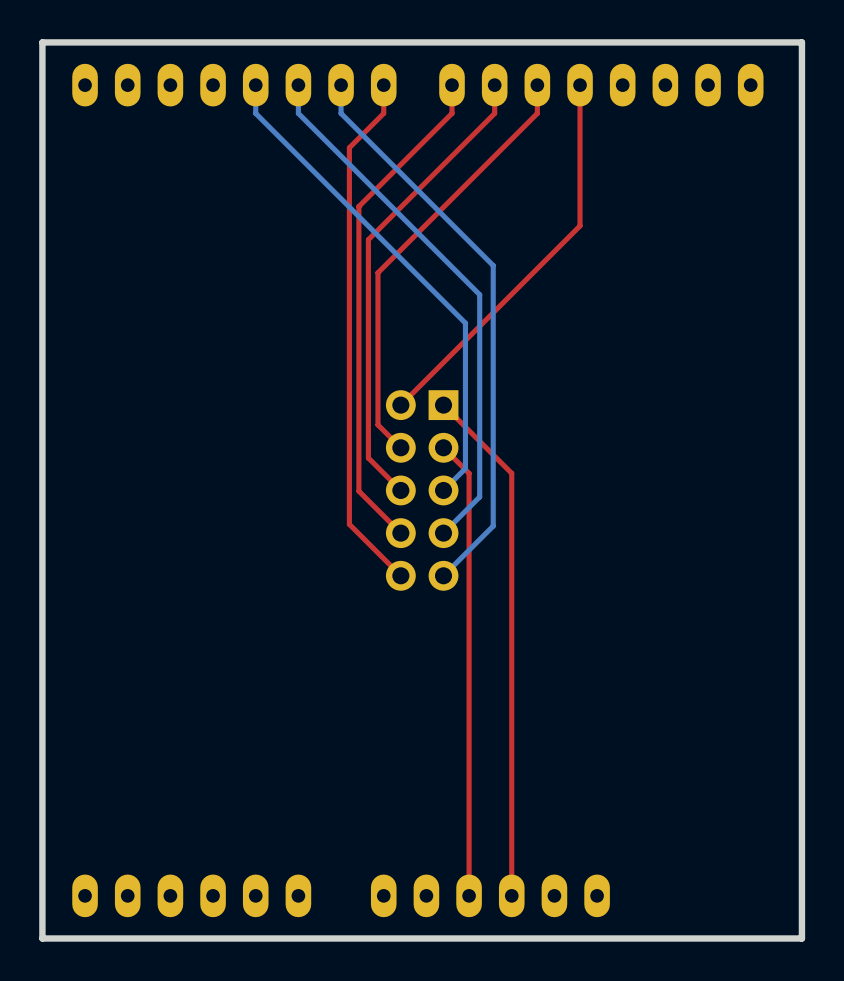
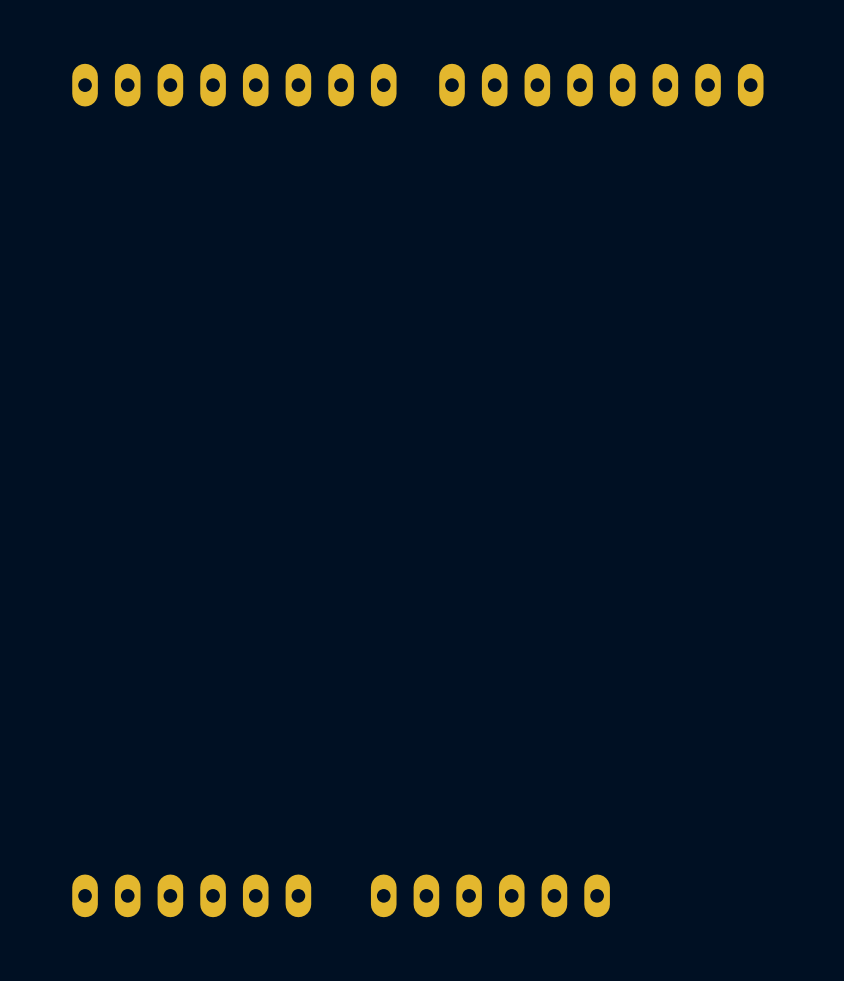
board edge: (801, 42) (801, 938) (42, 938) (42, 42) (801, 42) -> none
bottom track: (255, 85) (255, 113) (465, 323) (465, 468) (443, 490) -> none
bottom track: (298, 85) (298, 113) (479, 294) (479, 496) (443, 533) -> none
bottom track: (341, 85) (341, 113) (493, 265) (493, 526) (443, 575) -> none
top track: (383, 85) (383, 113) (349, 147) (349, 524) (400, 575) -> none
top track: (452, 85) (452, 113) (358, 206) (358, 491) (400, 533) -> none
top track: (494, 85) (494, 113) (368, 239) (368, 458) (400, 490) -> none
top track: (537, 85) (537, 113) (377, 272) (377, 424) (400, 447) -> none
top track: (580, 85) (580, 225) (400, 405) -> none
top track: (443, 405) (511, 473) (511, 895) -> none
top track: (443, 447) (469, 473) (469, 895) -> none
part: (422, 490) -> none

